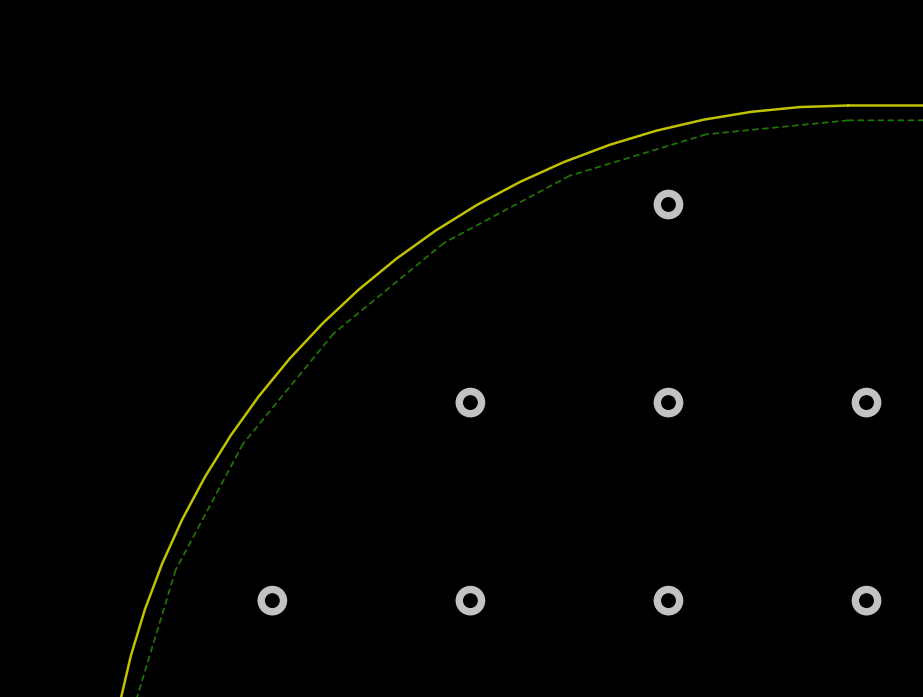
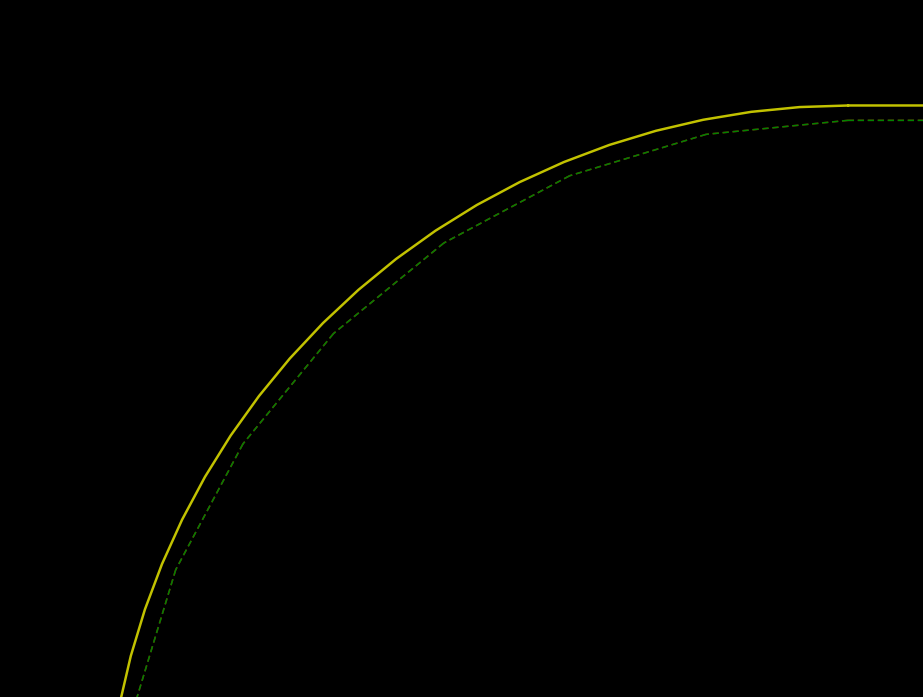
via: (668, 204) -> none
via: (470, 402) -> none
via: (668, 402) -> none
via: (866, 402) -> none
via: (272, 600) -> none
via: (470, 600) -> none
via: (668, 600) -> none
via: (866, 600) -> none

